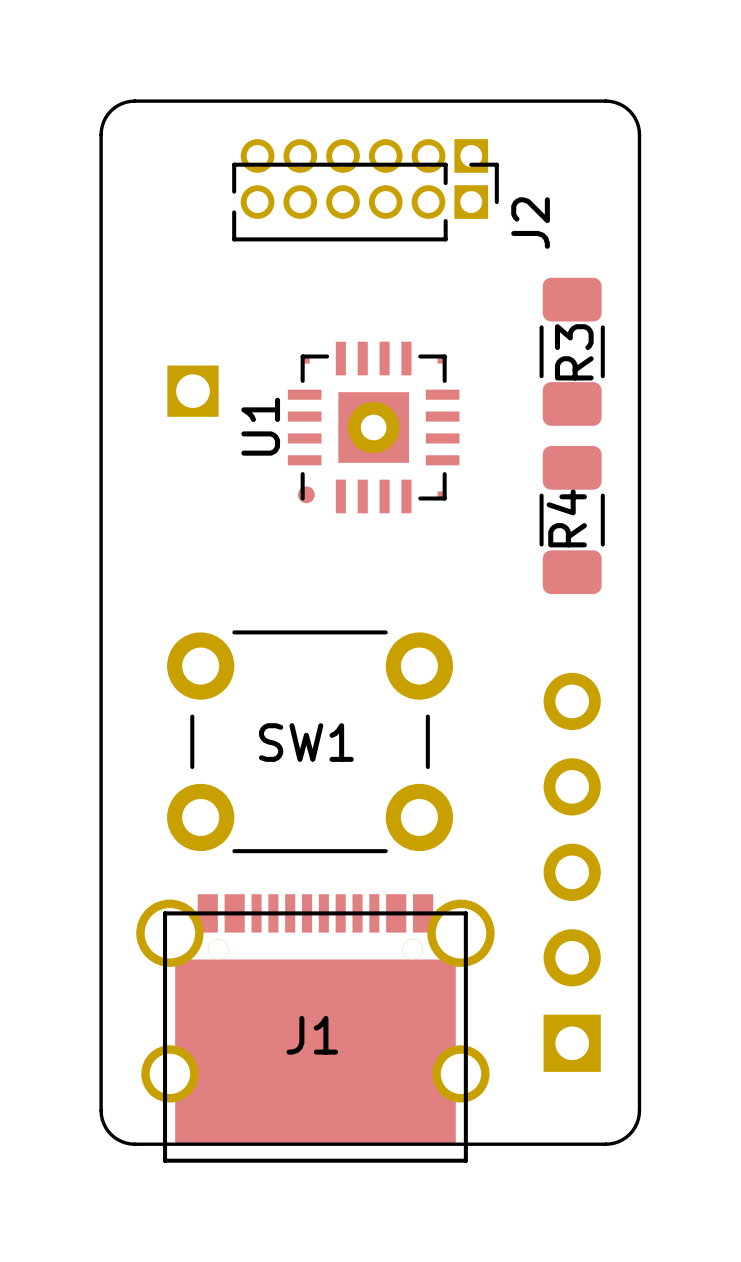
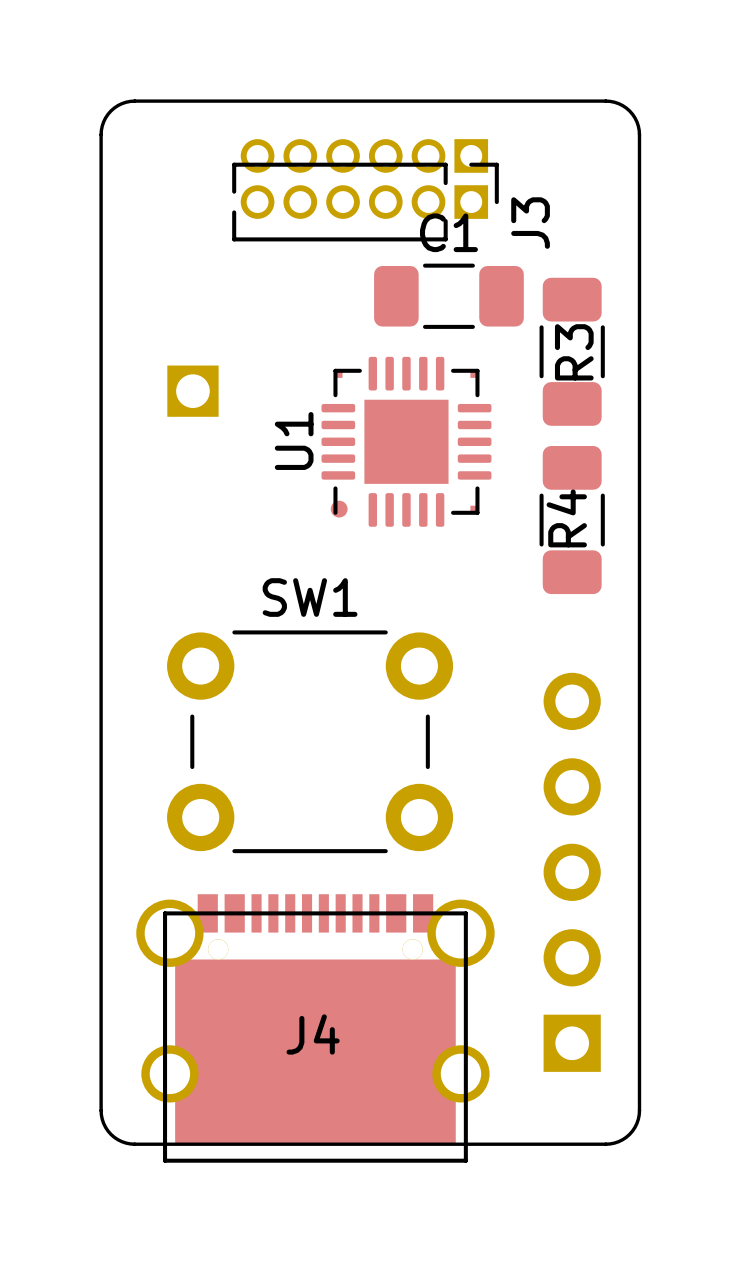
J2 name: J2 (530, 223) -> J3 (530, 223)
C1: none -> (448, 296)
U1 footprint: [287, 341, 460, 514] -> [321, 356, 492, 527]
SW1 name position: SW1 (306, 742) -> SW1 (310, 597)
J1 name: J1 (312, 1035) -> J4 (313, 1034)

